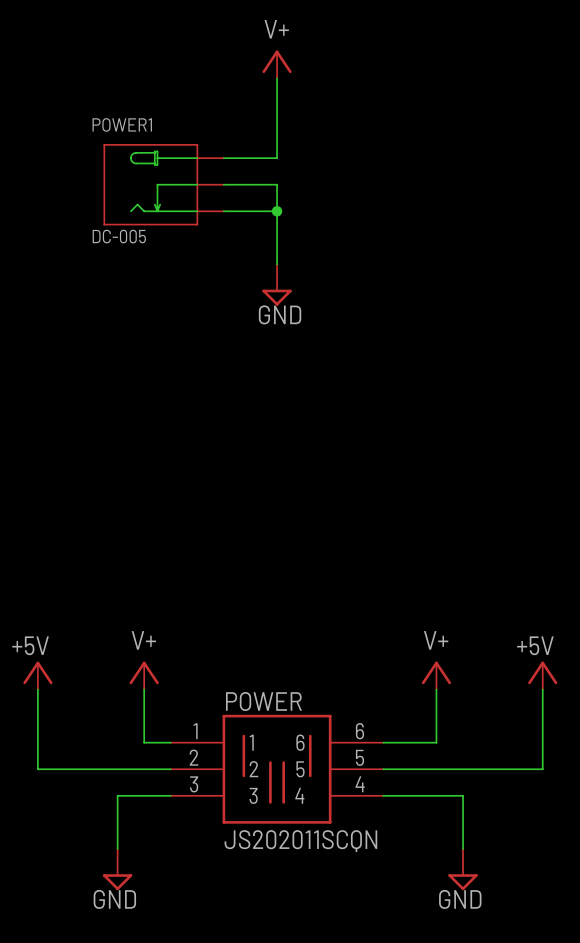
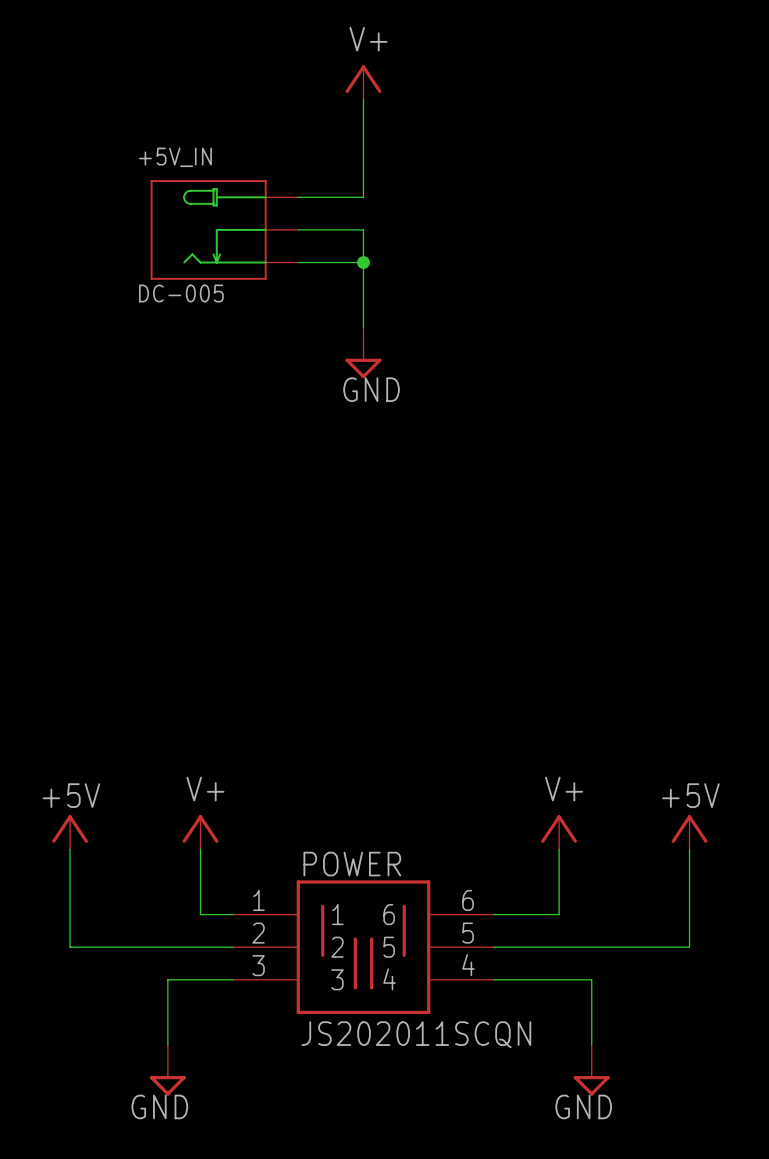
POWER1 name: POWER1 (122, 124) -> +5V_IN (175, 157)

